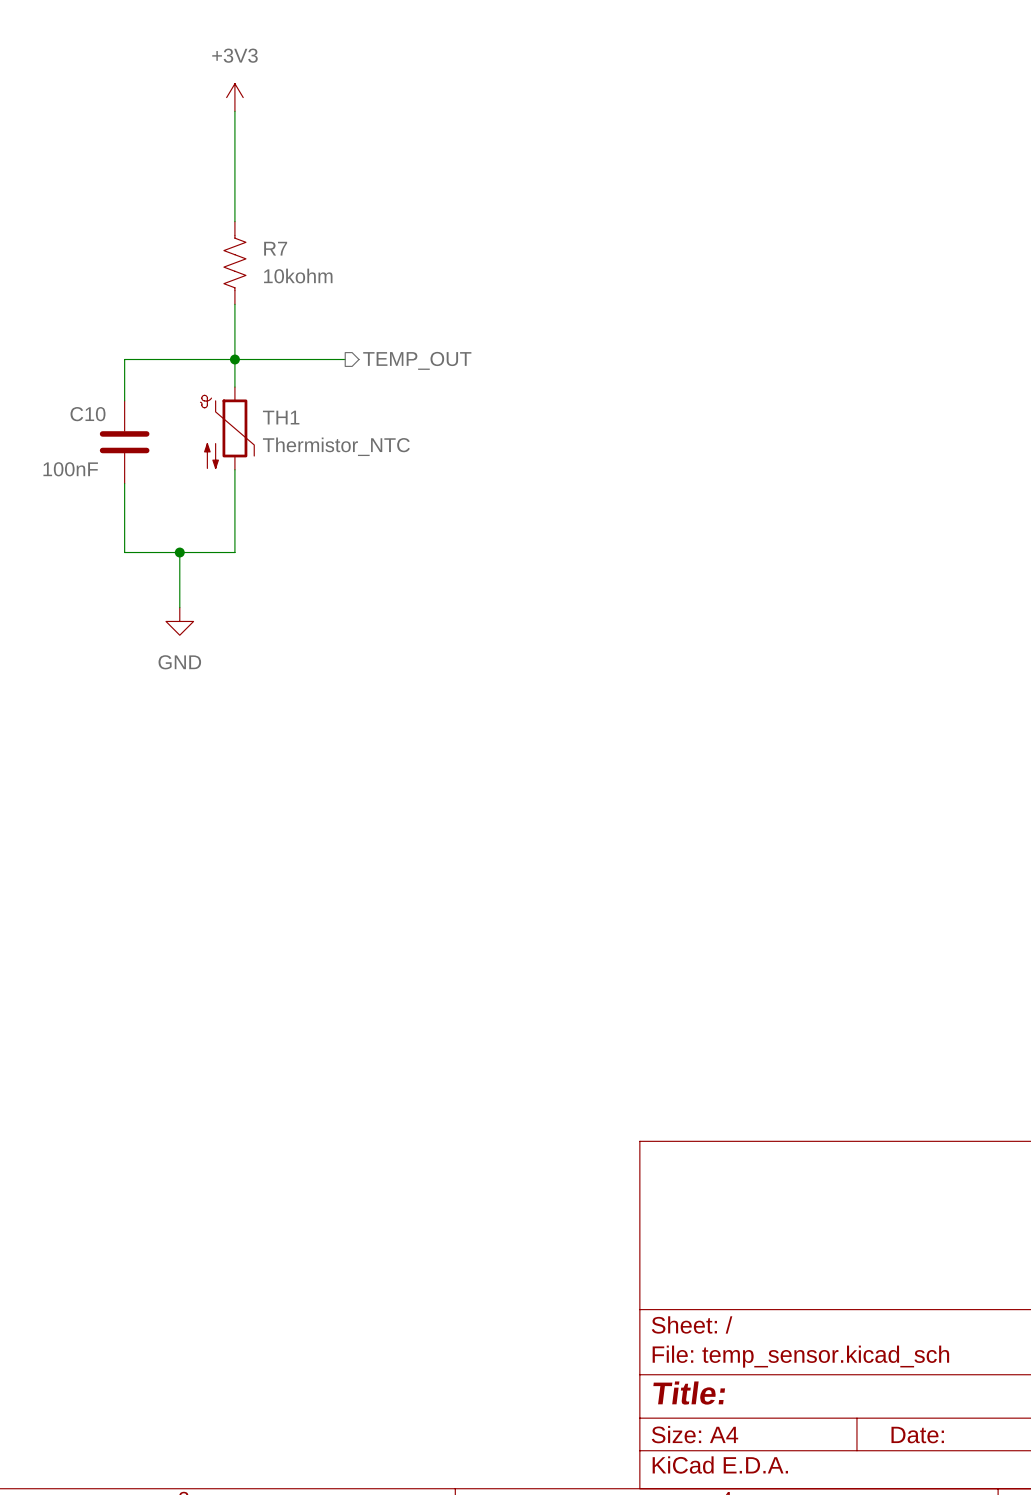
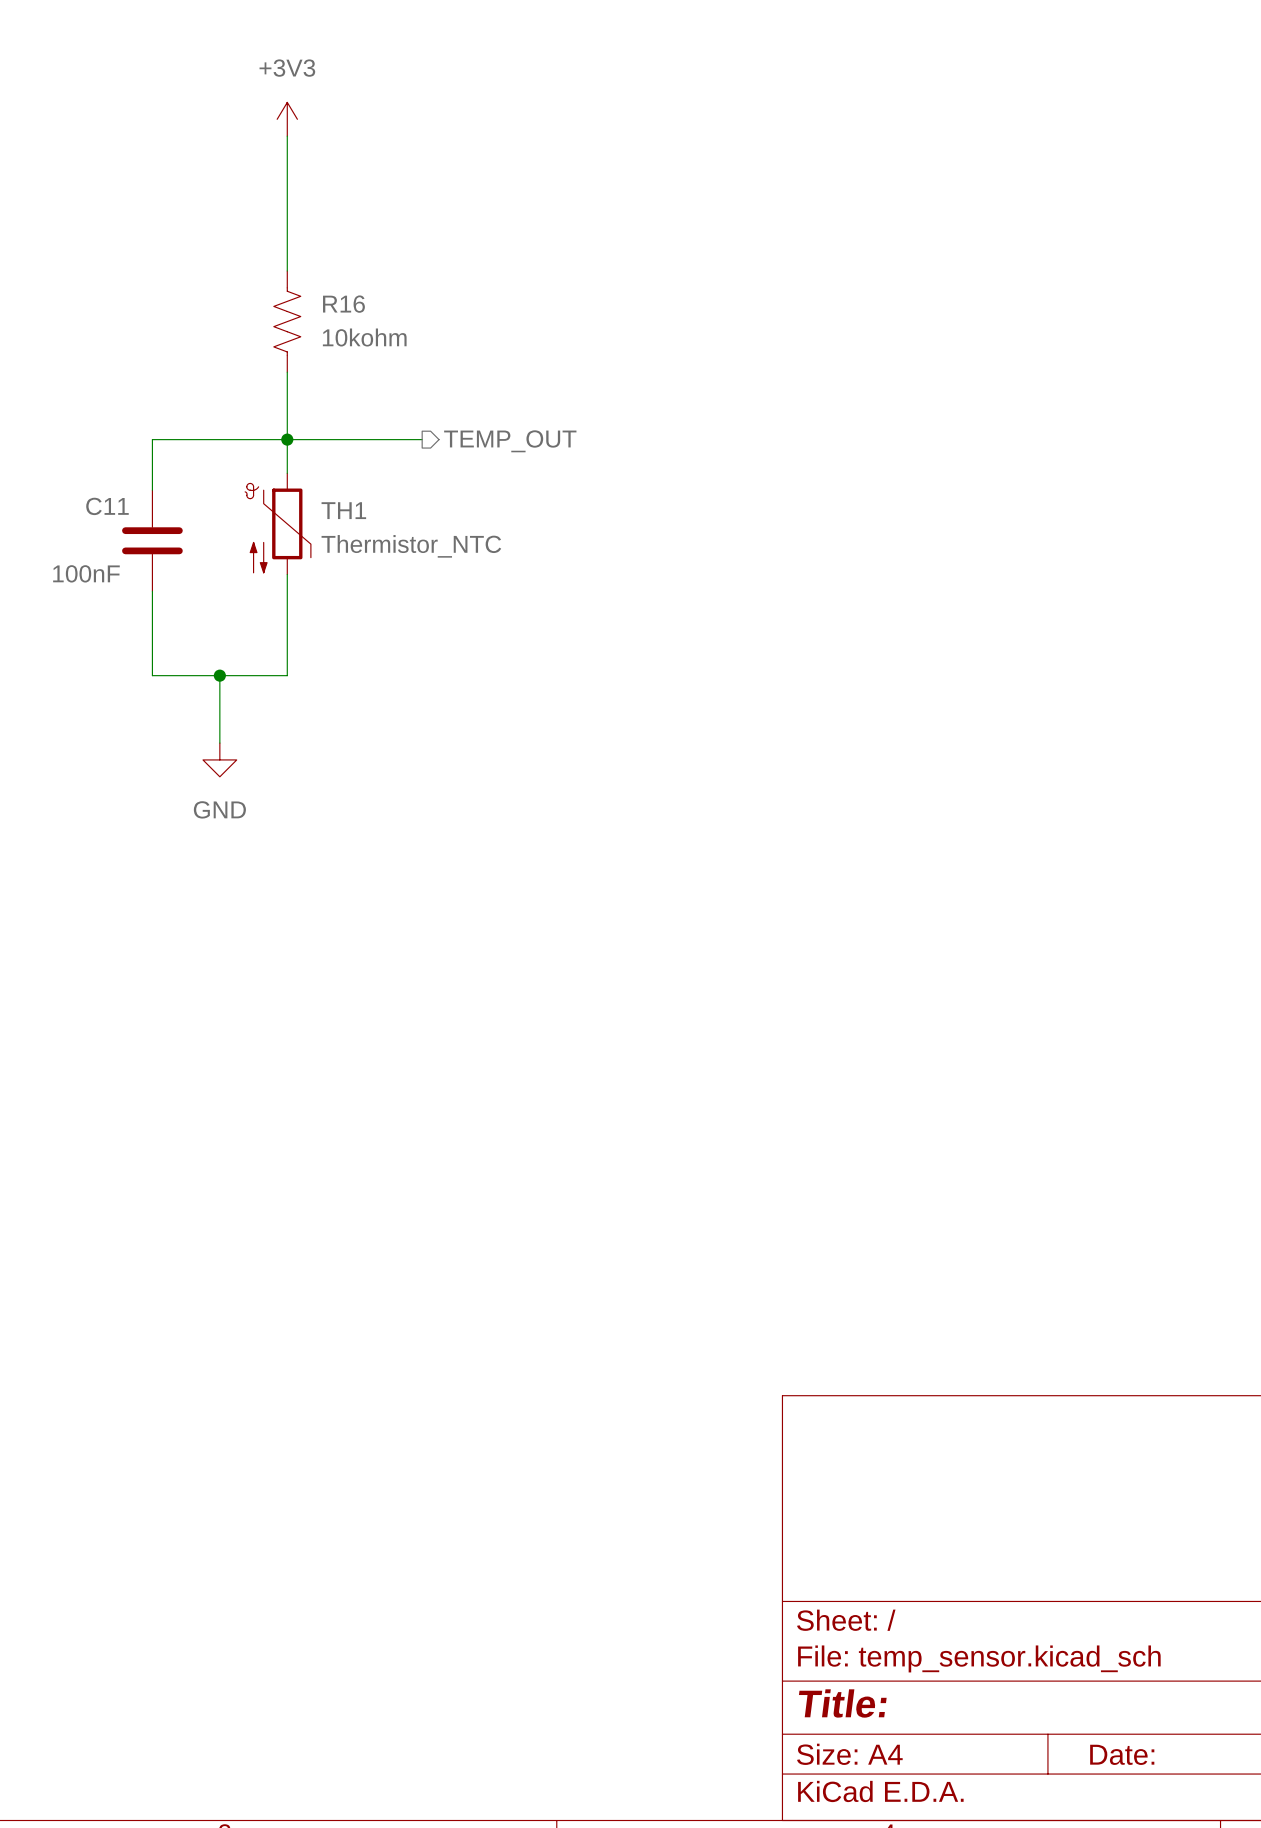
R7 name: R7 (275, 248) -> R16 (343, 304)
C10 name: C10 (87, 414) -> C11 (107, 506)

